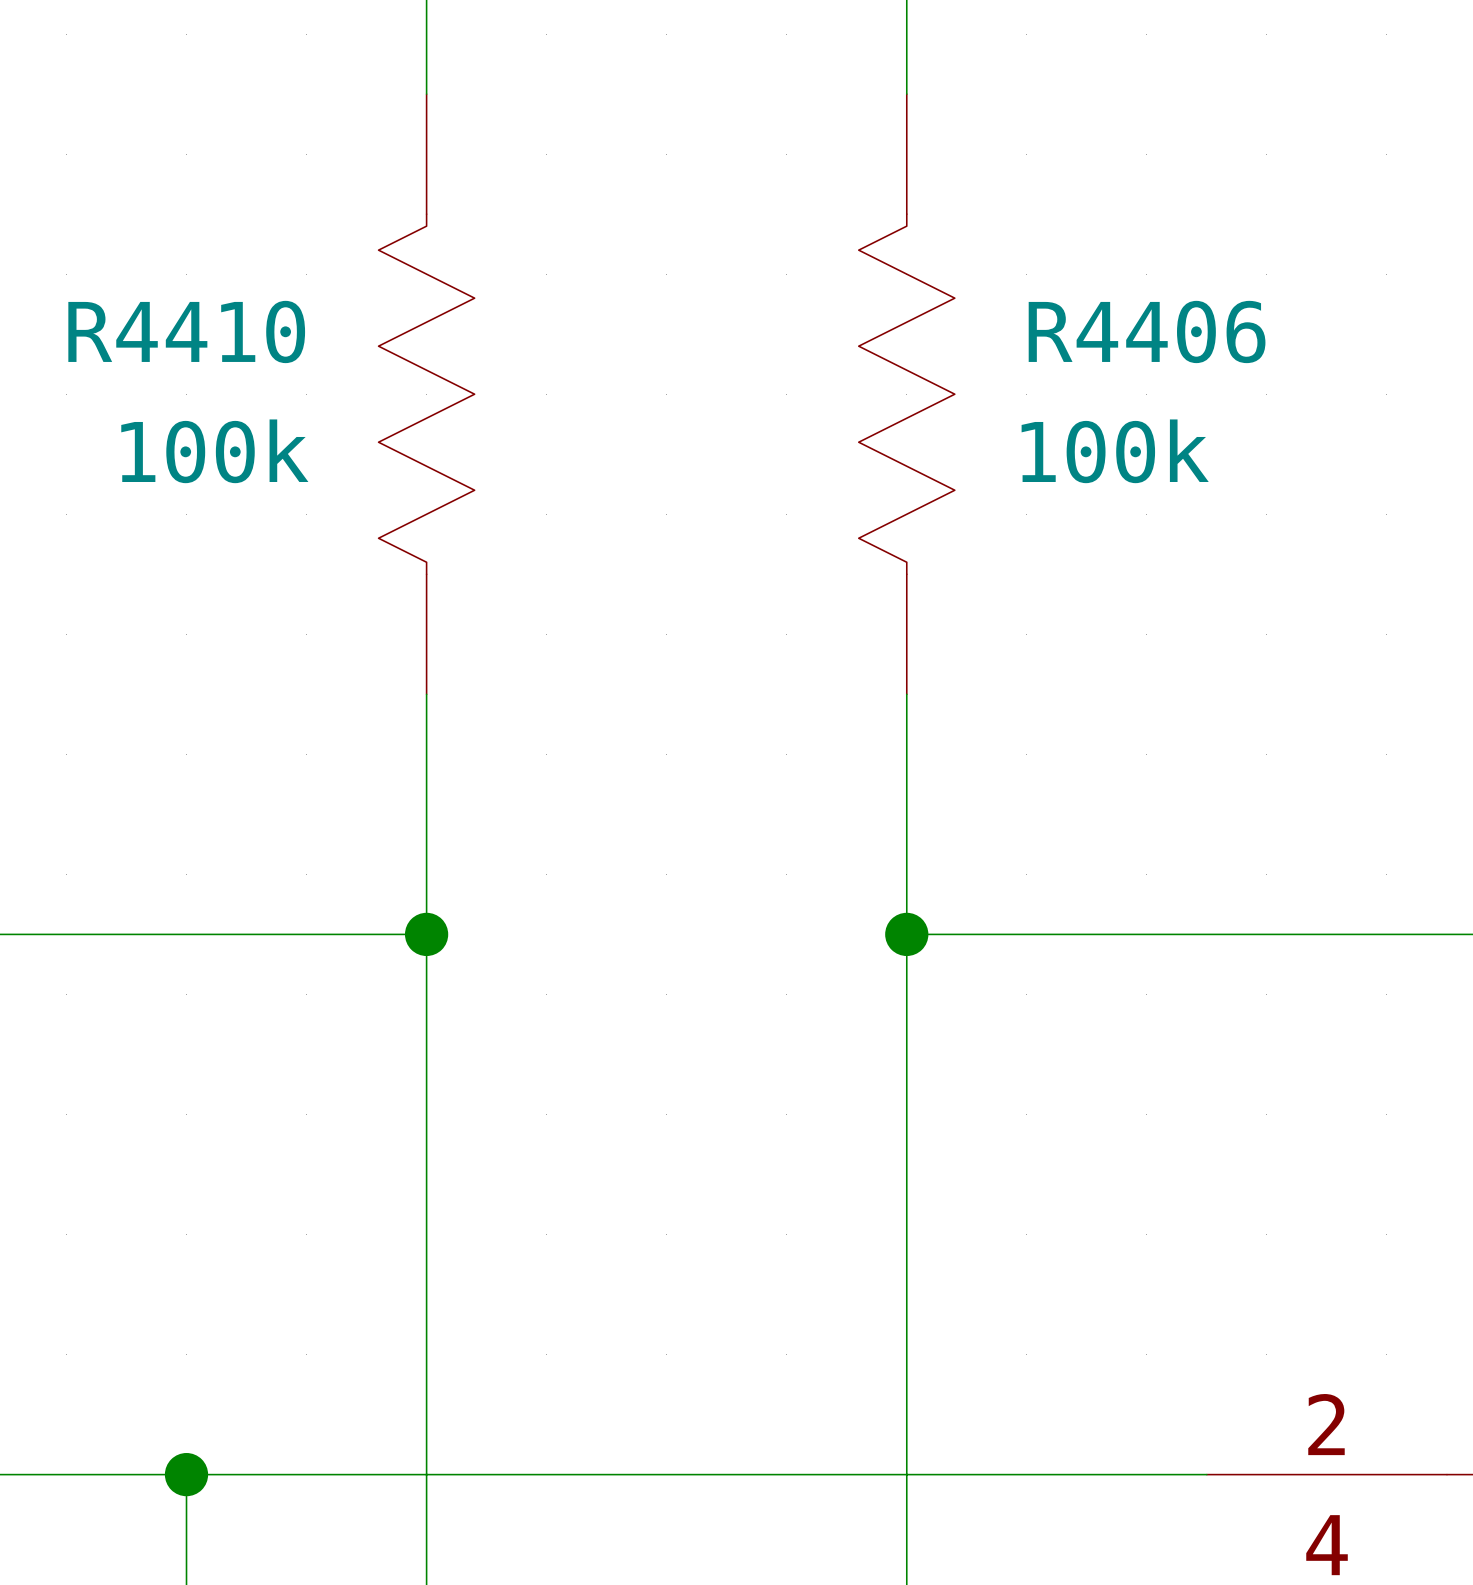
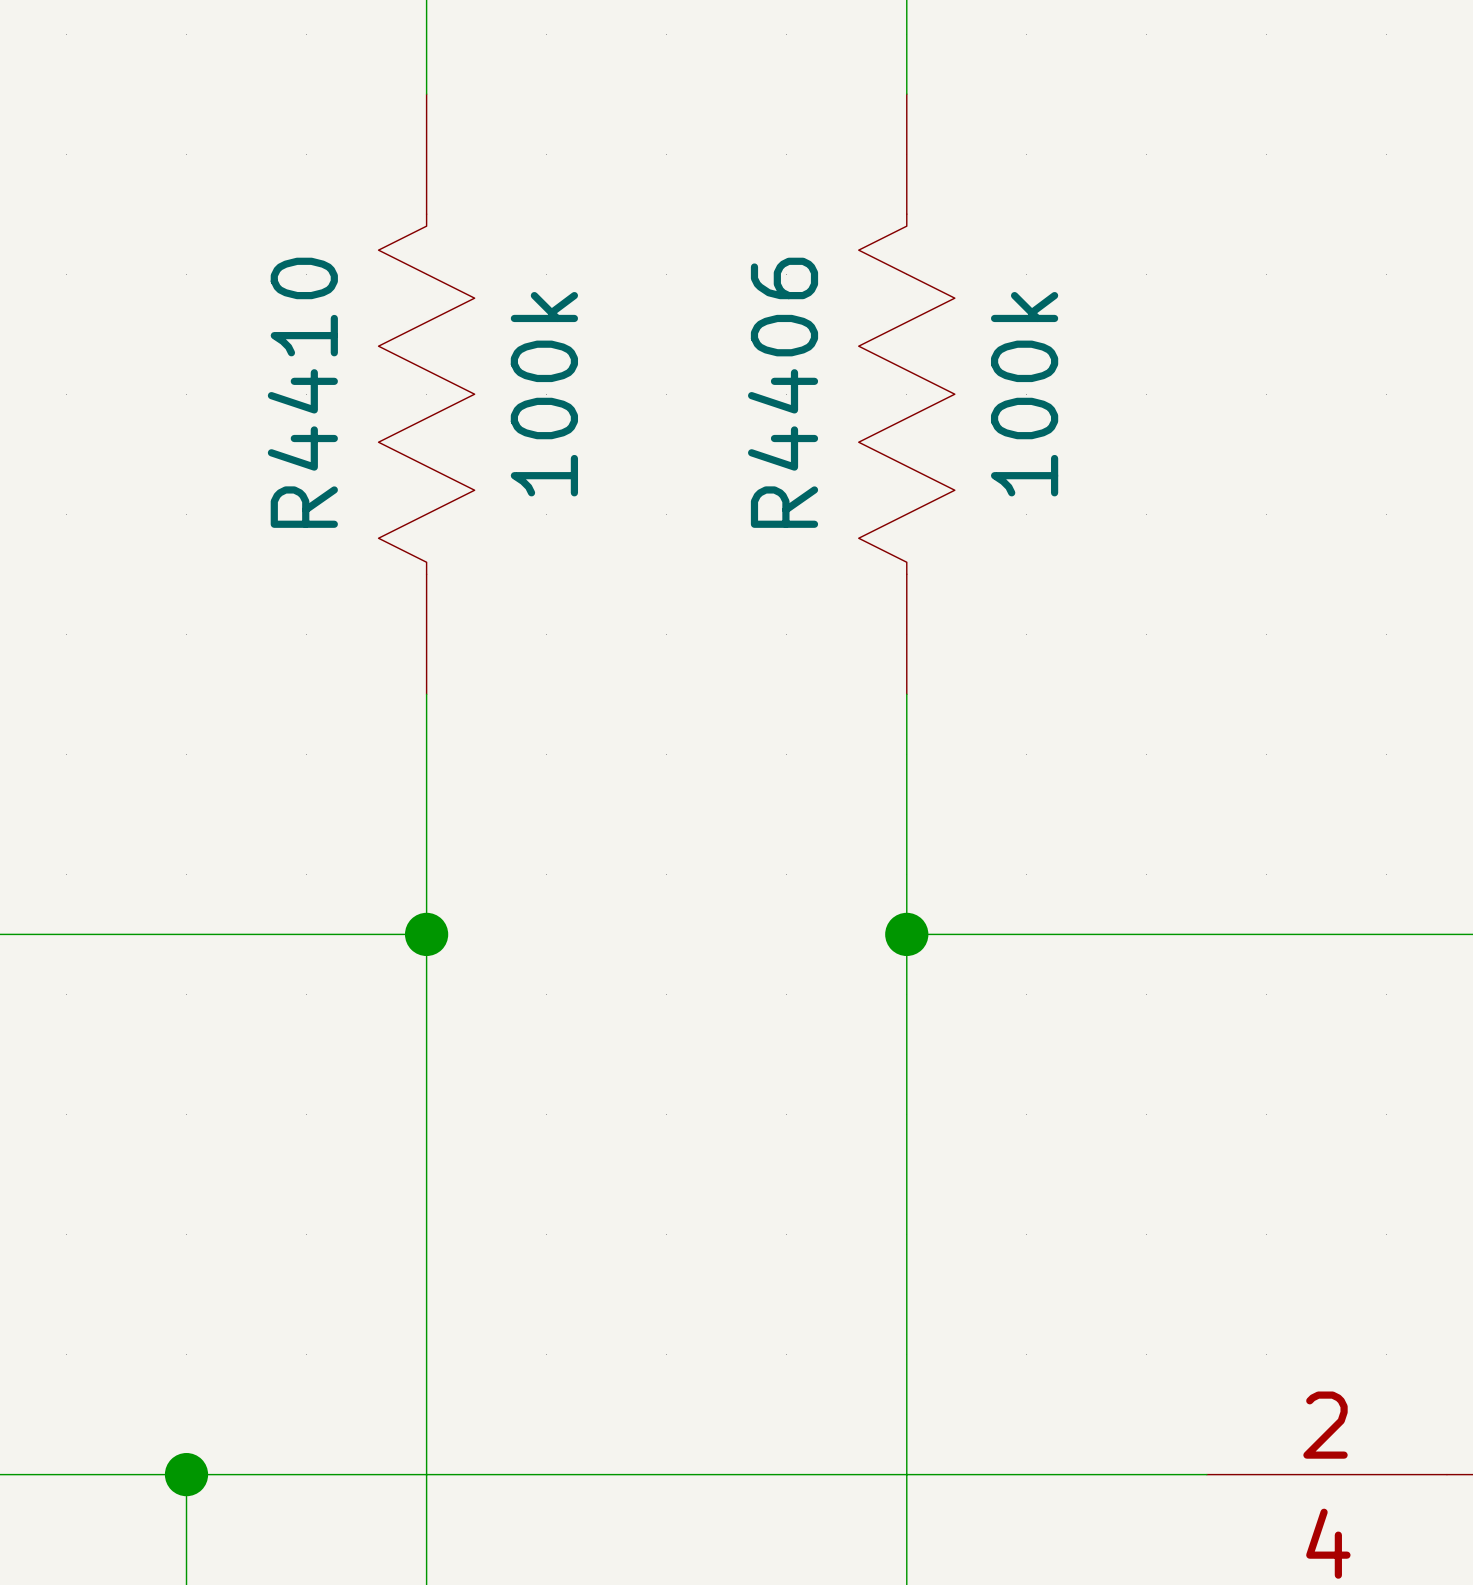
R4410 name rotation: 0° (186, 331) -> 90° counterclockwise (302, 392)
R4406 name rotation: 0° (1147, 331) -> 90° counterclockwise (783, 392)
R4406 name position: R4406 (1147, 331) -> R4406 (783, 392)
R4410 value rotation: 0° (214, 451) -> 90° counterclockwise (544, 394)
R4410 value position: 100k (214, 451) -> 100k (544, 394)
R4406 value rotation: 0° (1115, 451) -> 90° counterclockwise (1024, 394)

